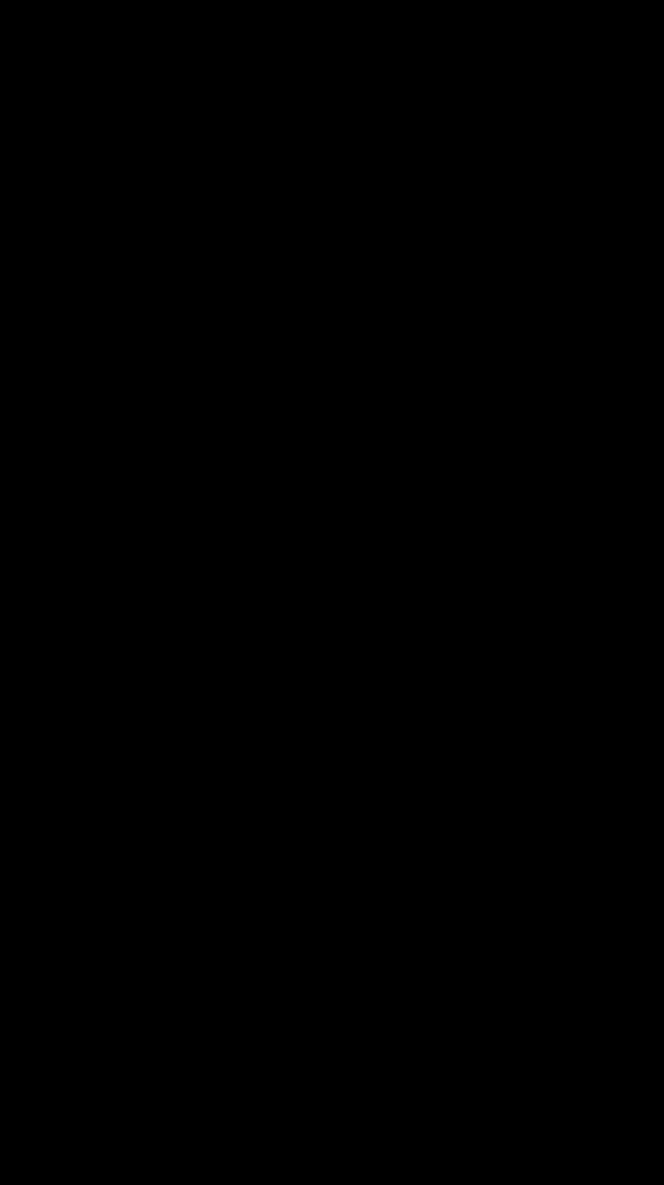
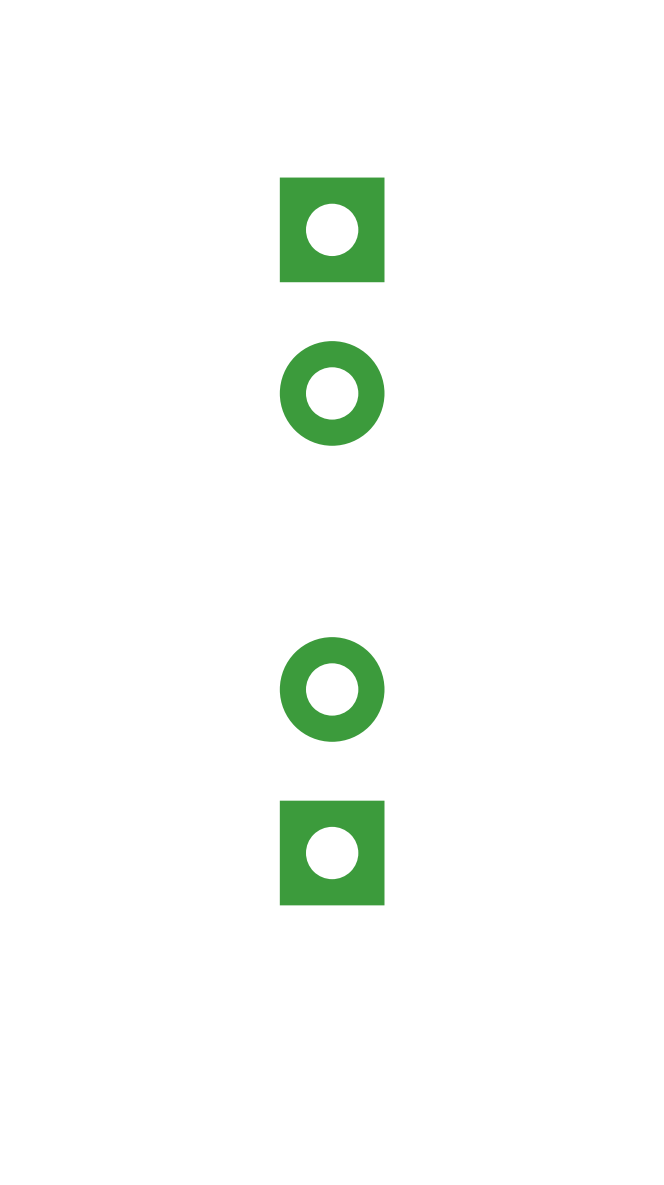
part: none -> (332, 311)
part: none -> (332, 771)

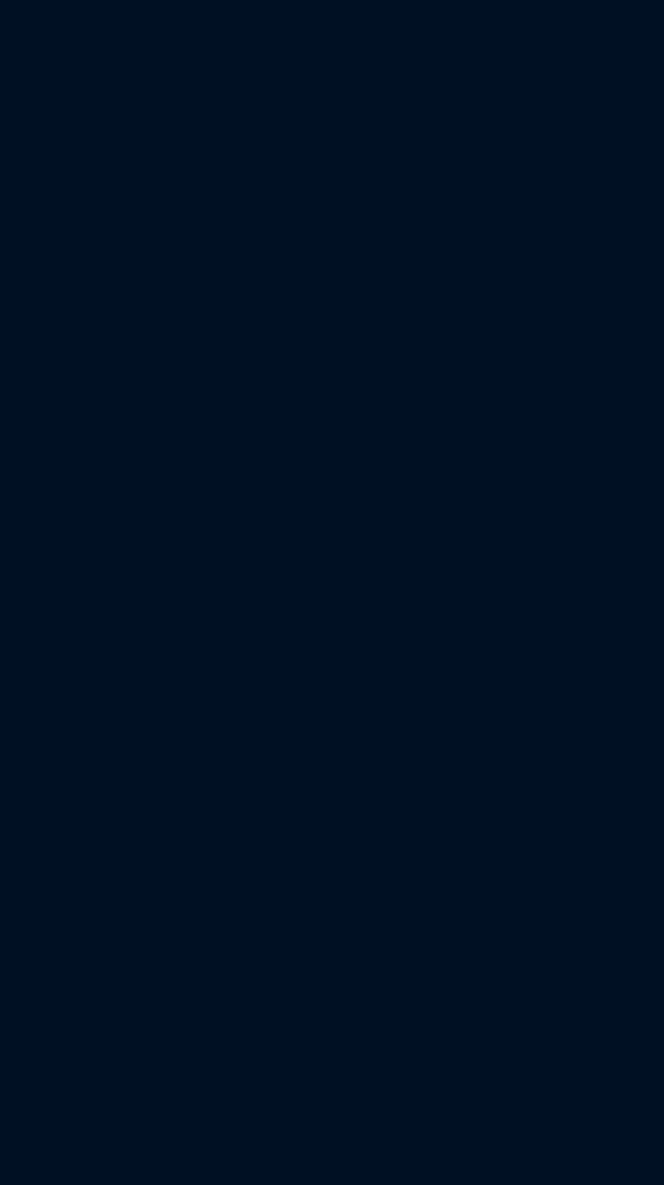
part: (332, 311) -> none
part: (332, 771) -> none

